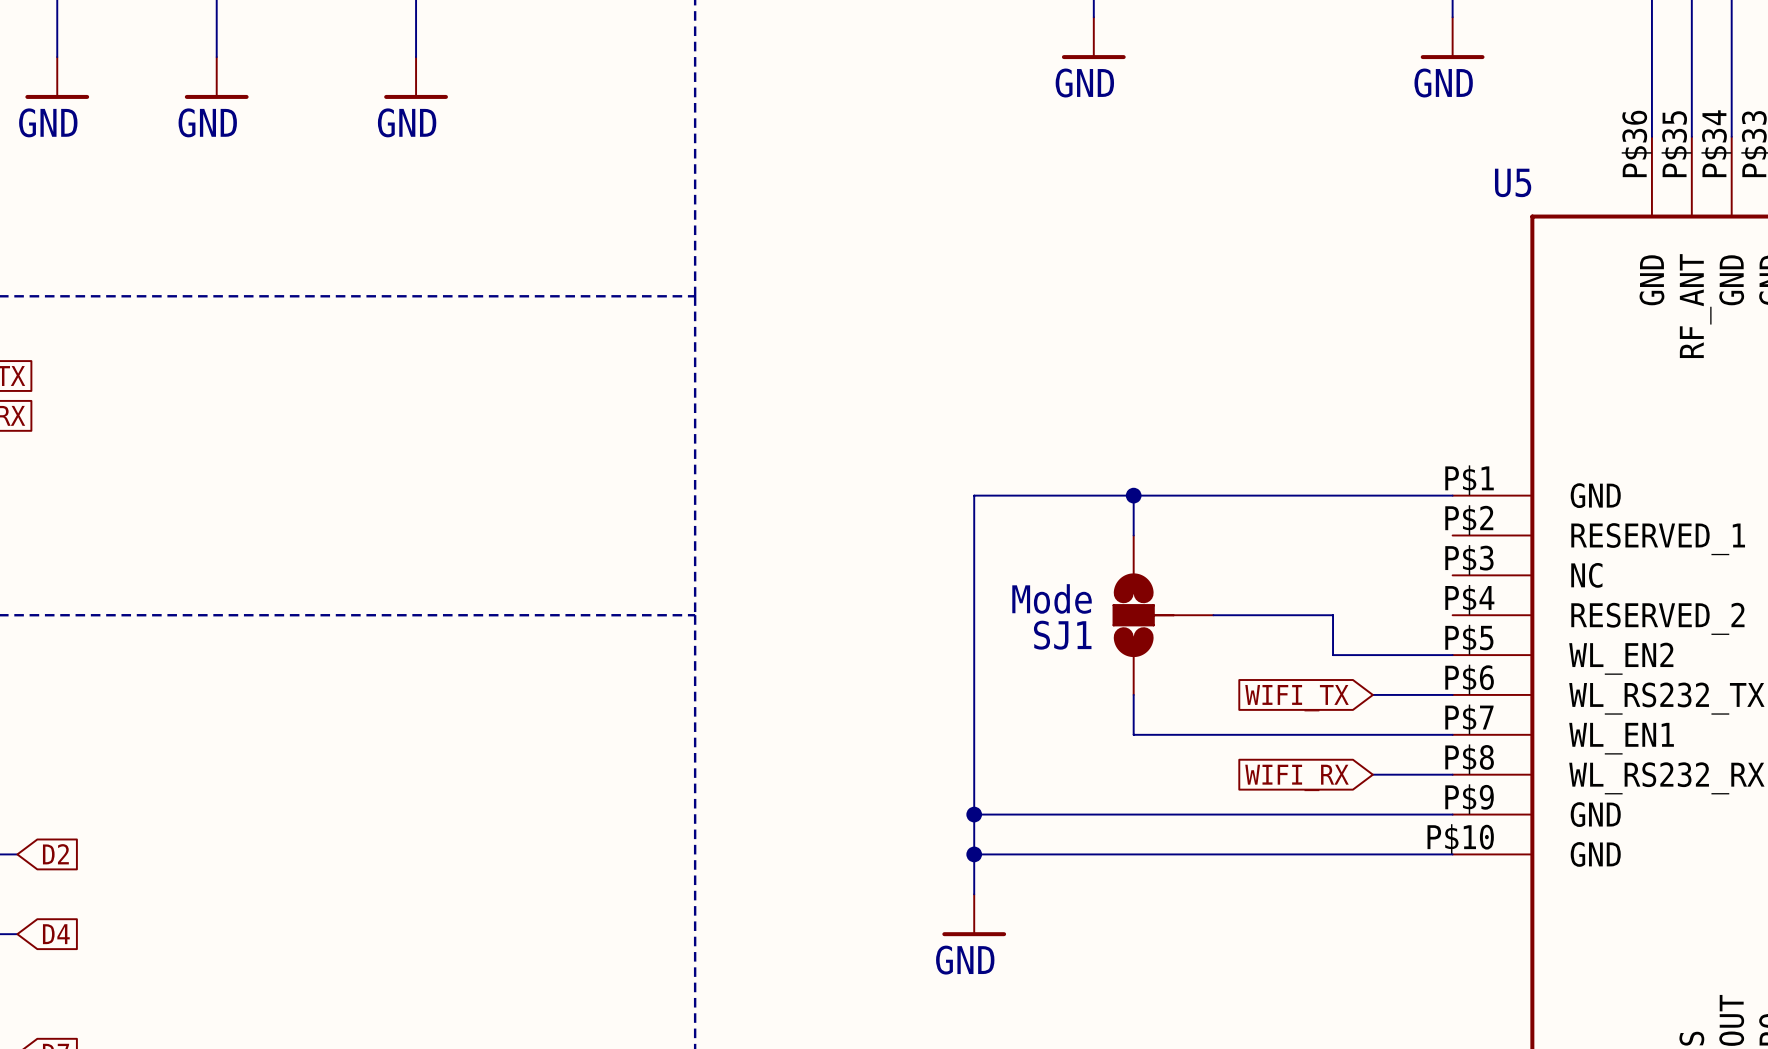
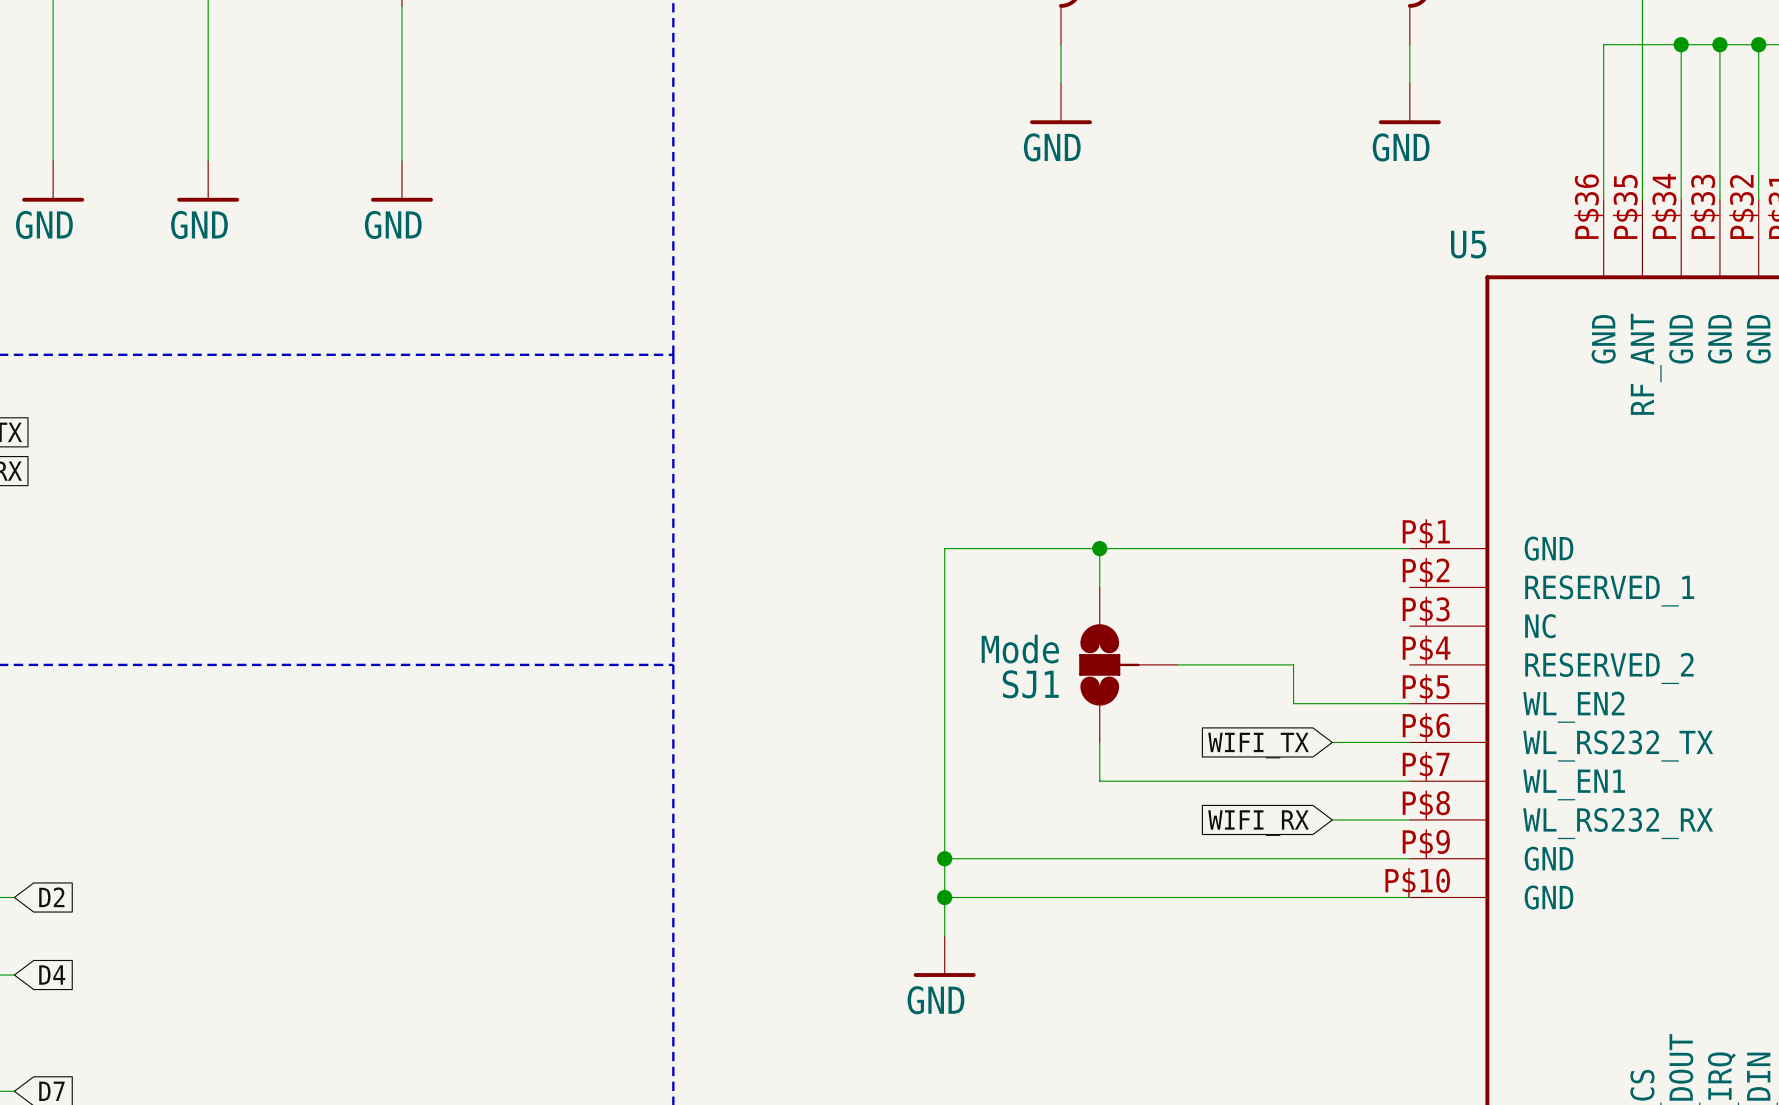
power symbol position: GND (57, 78) -> GND (53, 181)
power symbol position: GND (216, 78) -> GND (208, 181)
power symbol position: GND (416, 78) -> GND (402, 181)

